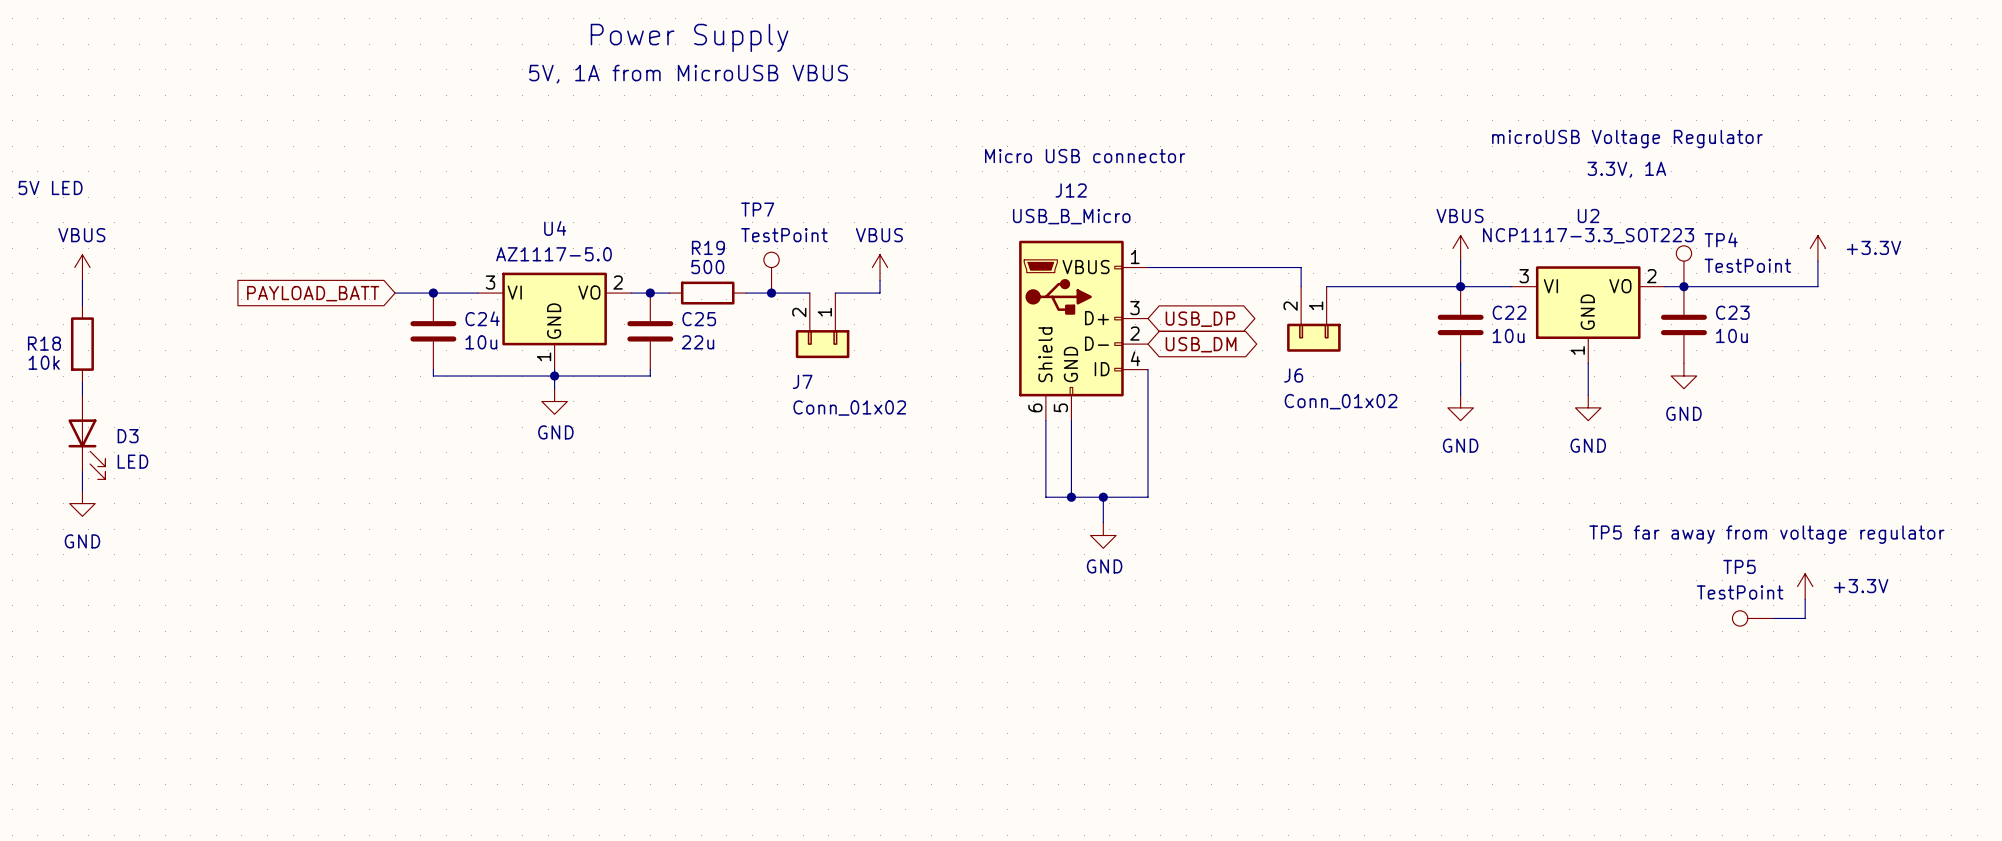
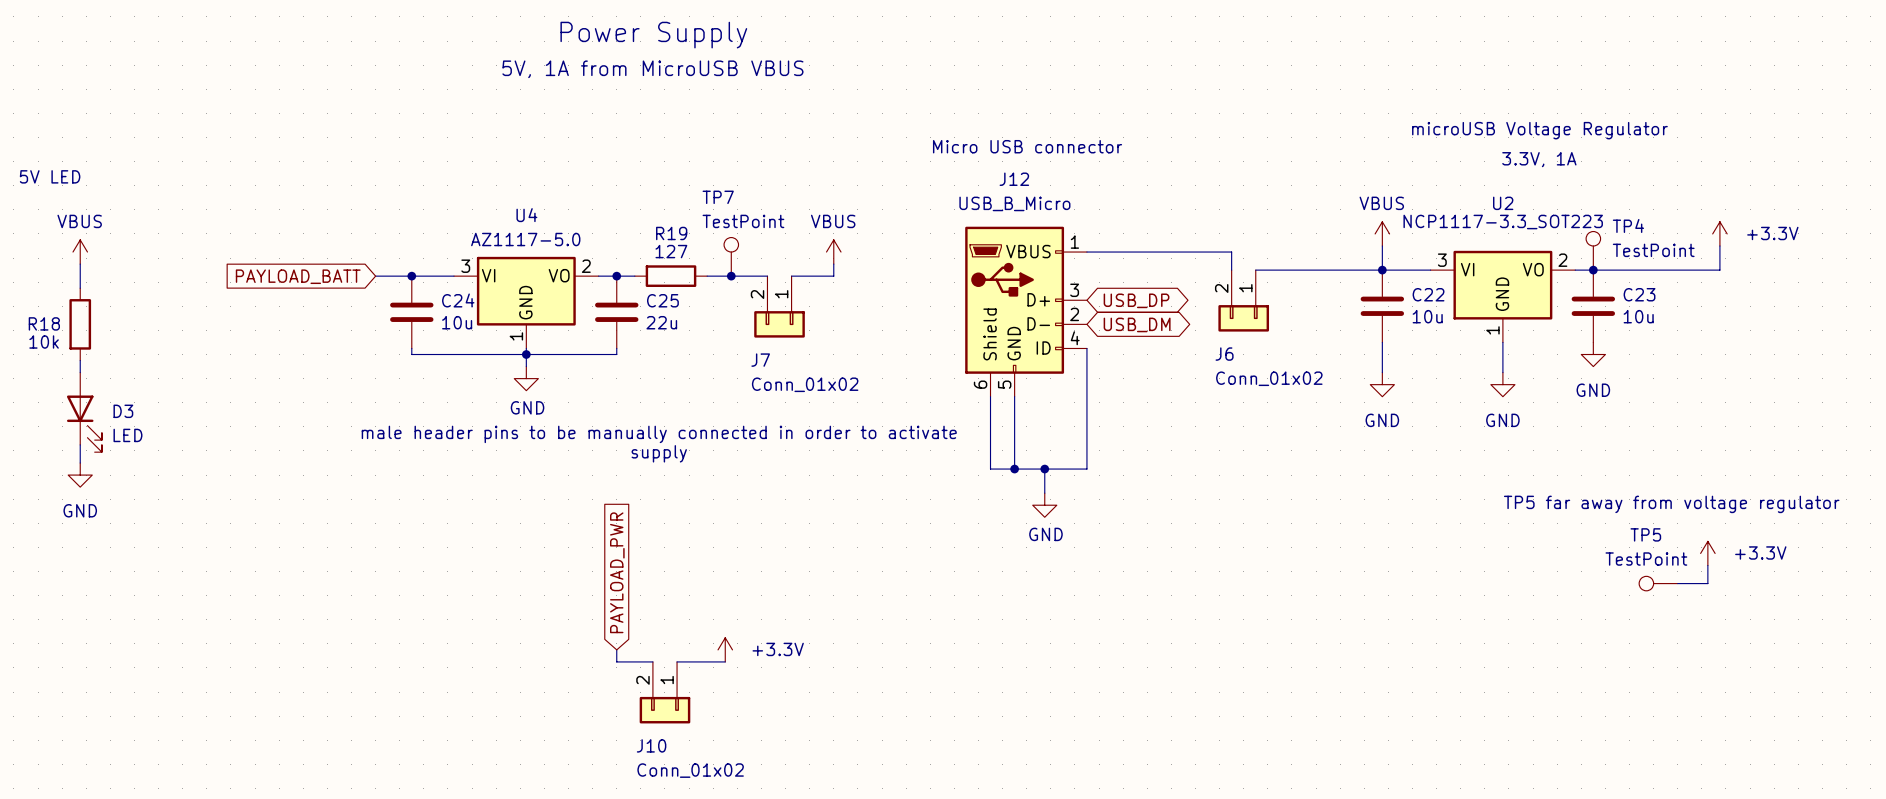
R19 value: 500 (707, 267) -> 127 (671, 251)
text: none -> male header pins to be manually connected in order to activate (659, 434)
text: none -> supply (659, 453)
global label: none -> PAYLOAD_PWR (617, 572)
wire: none -> (616, 649) (616, 661) (652, 661)
power symbol: none -> +3.3V (725, 649)
wire: none -> (677, 661) (725, 661)
J10: none -> Conn_01x02 (664, 692)

